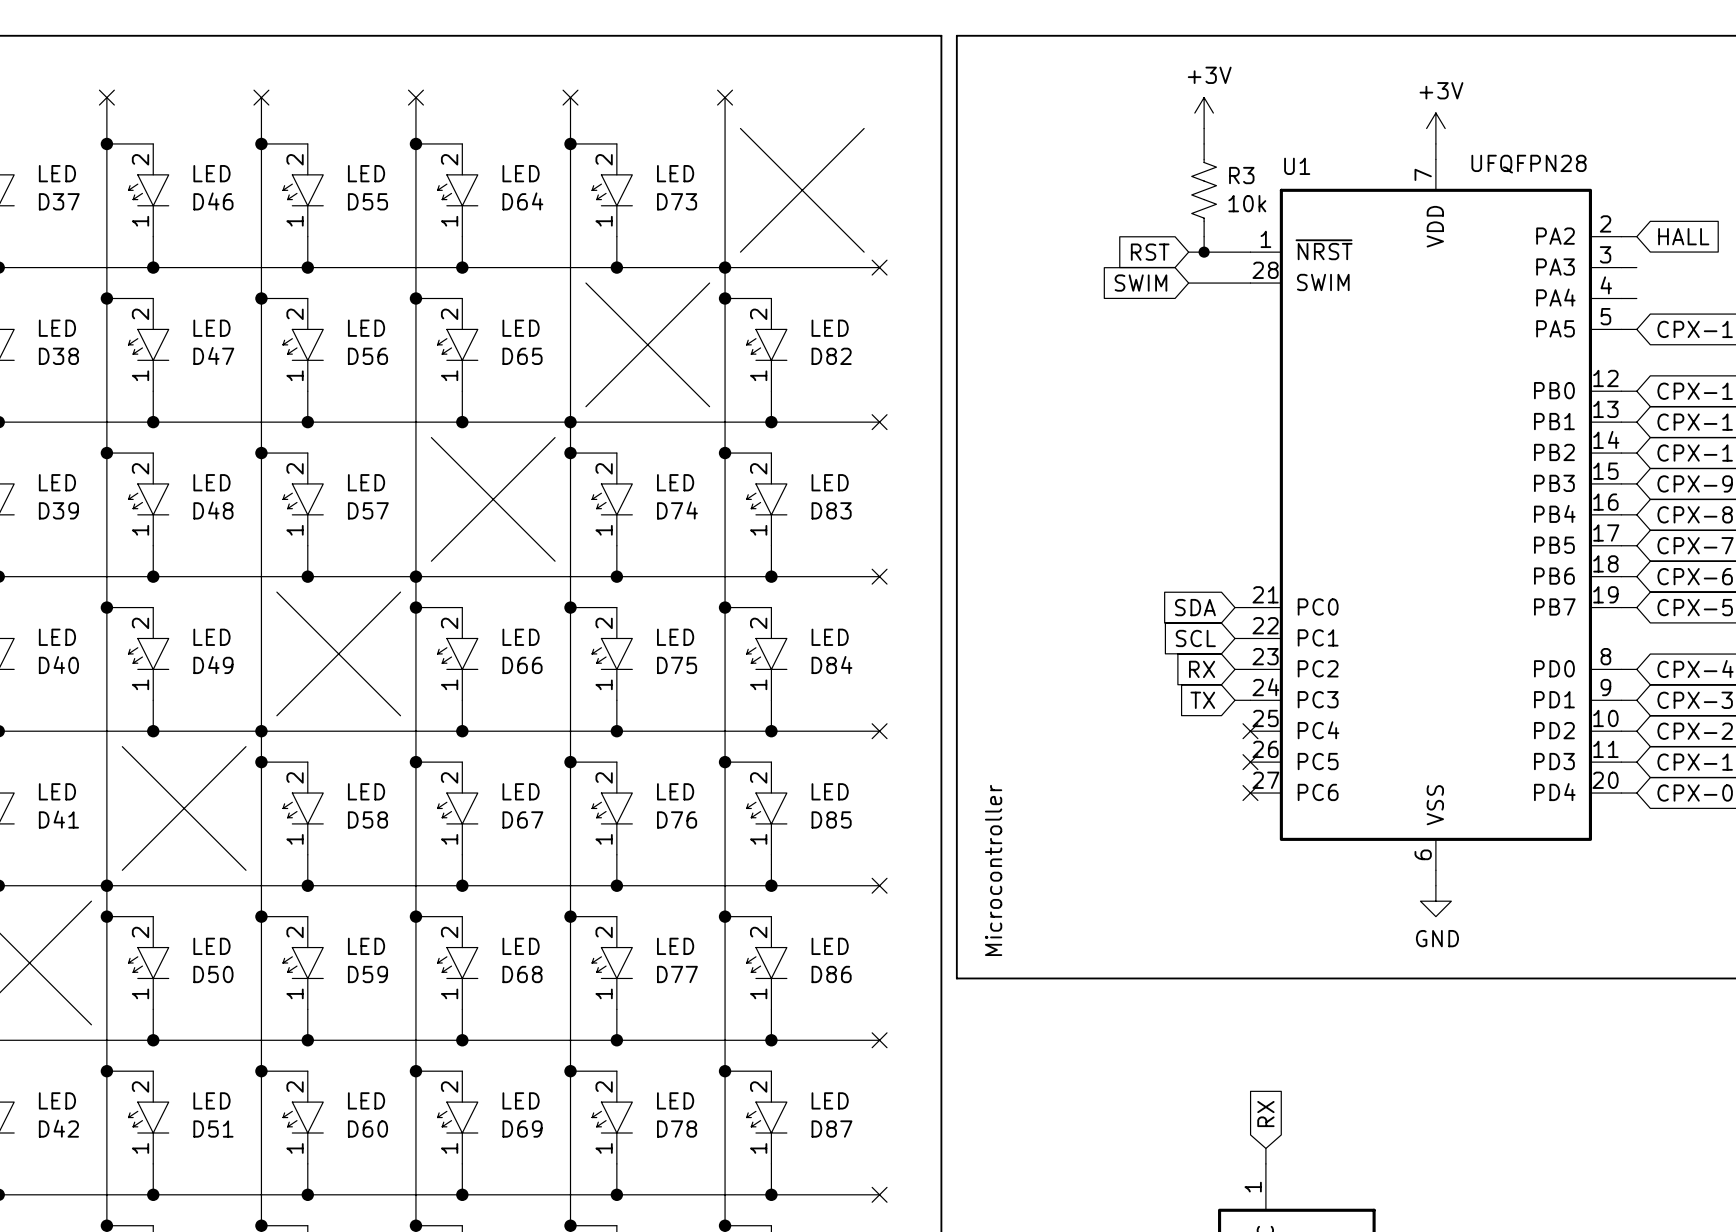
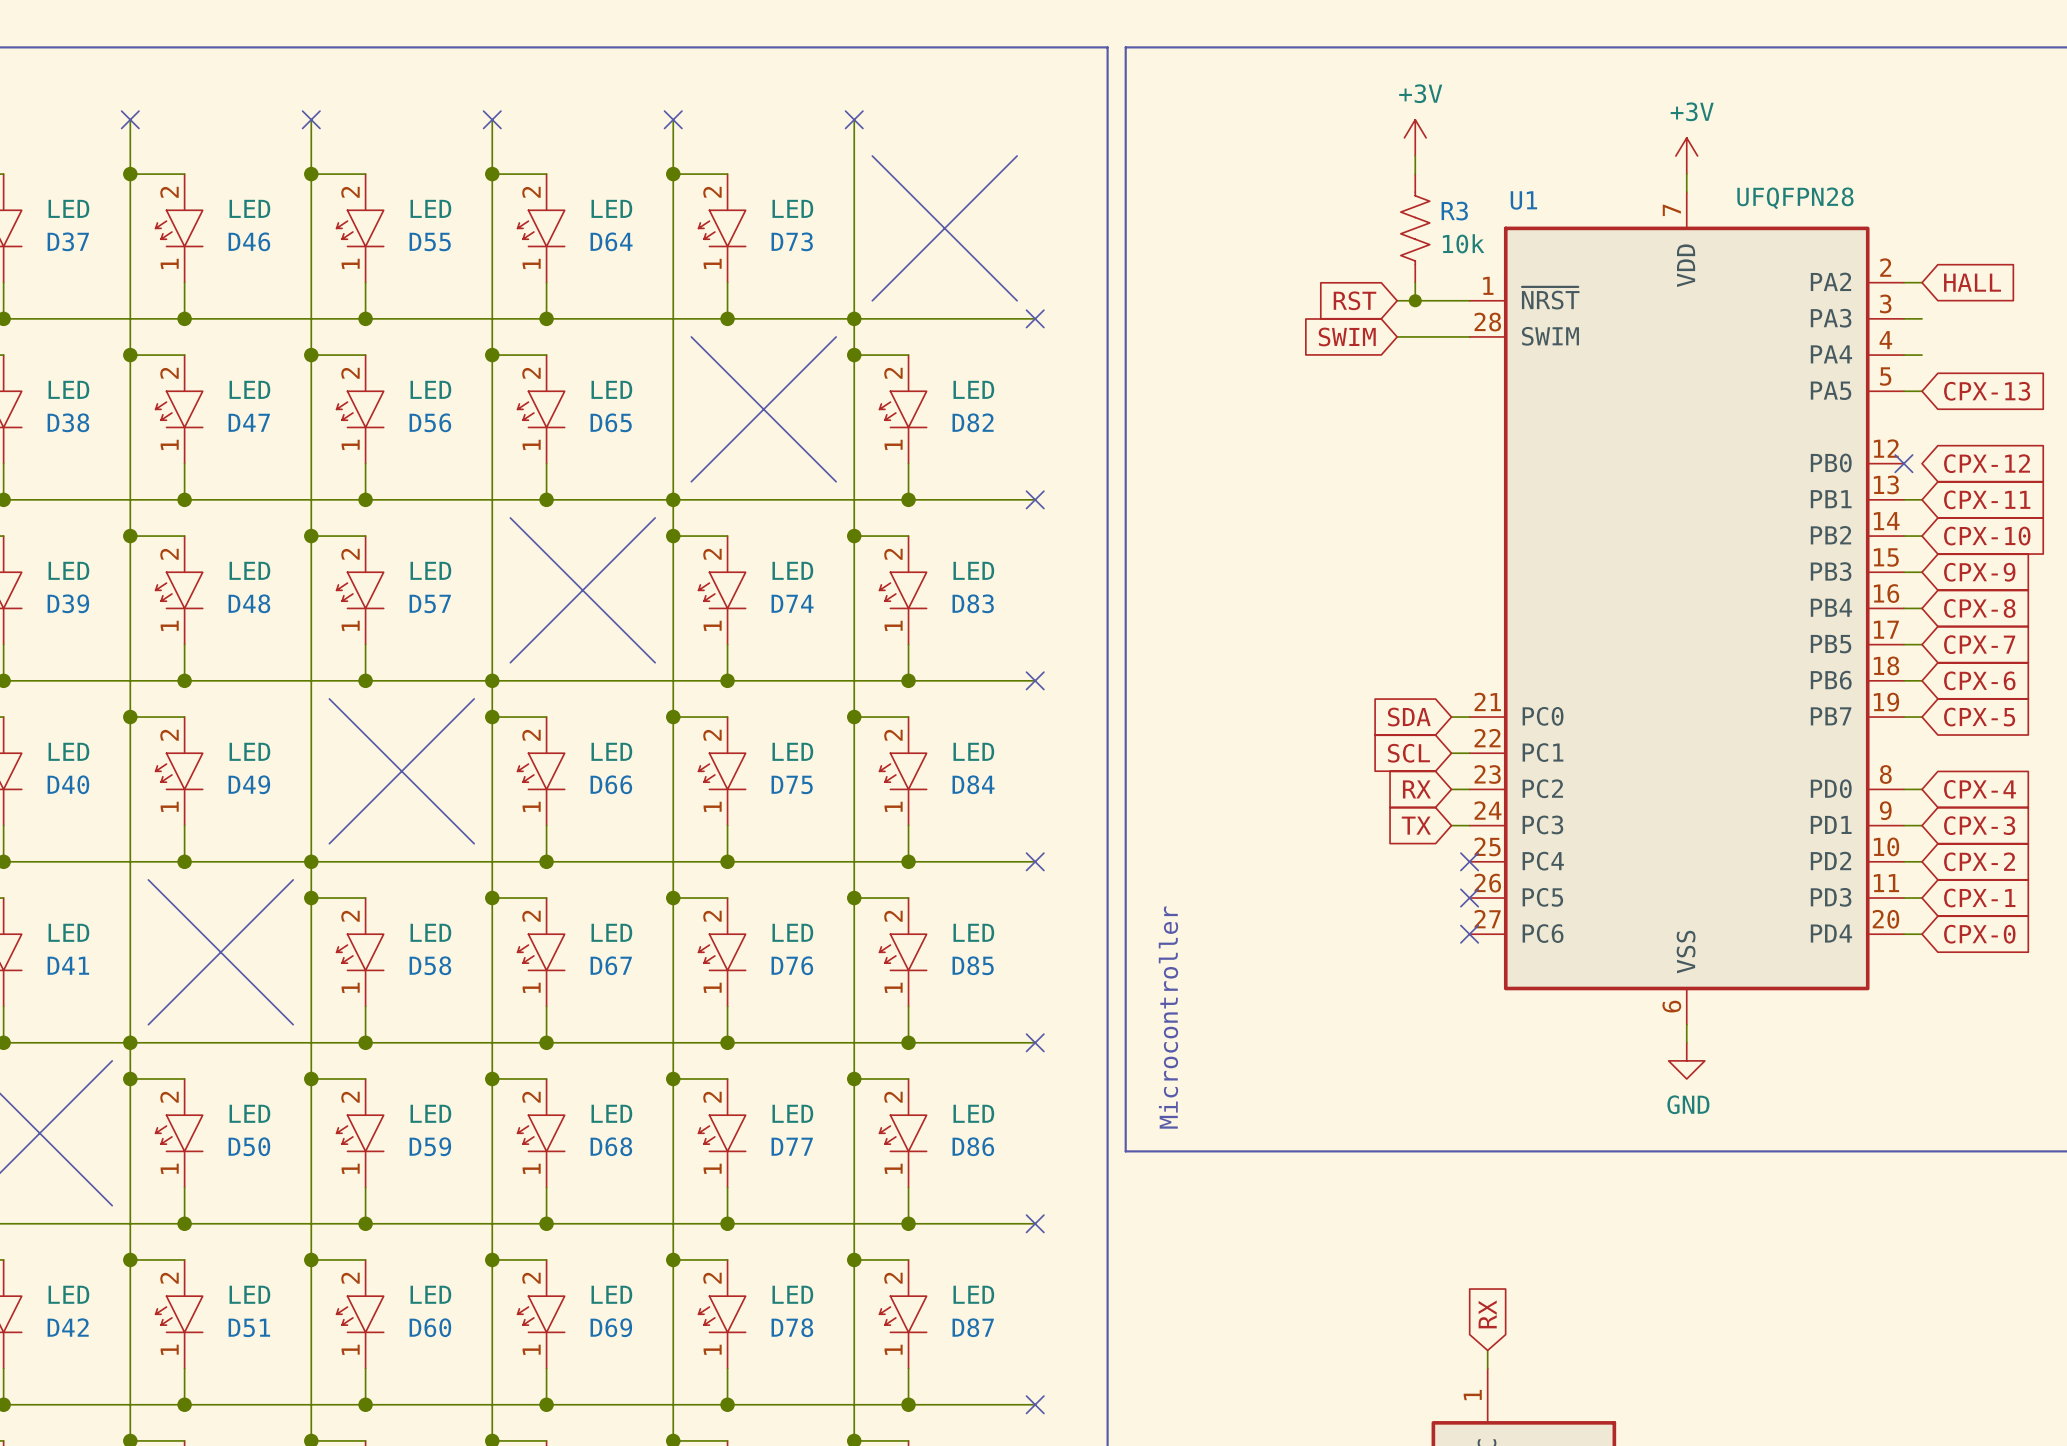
wire: (1621, 391) (1636, 391) -> none
no-connect mark: none -> (1903, 463)

